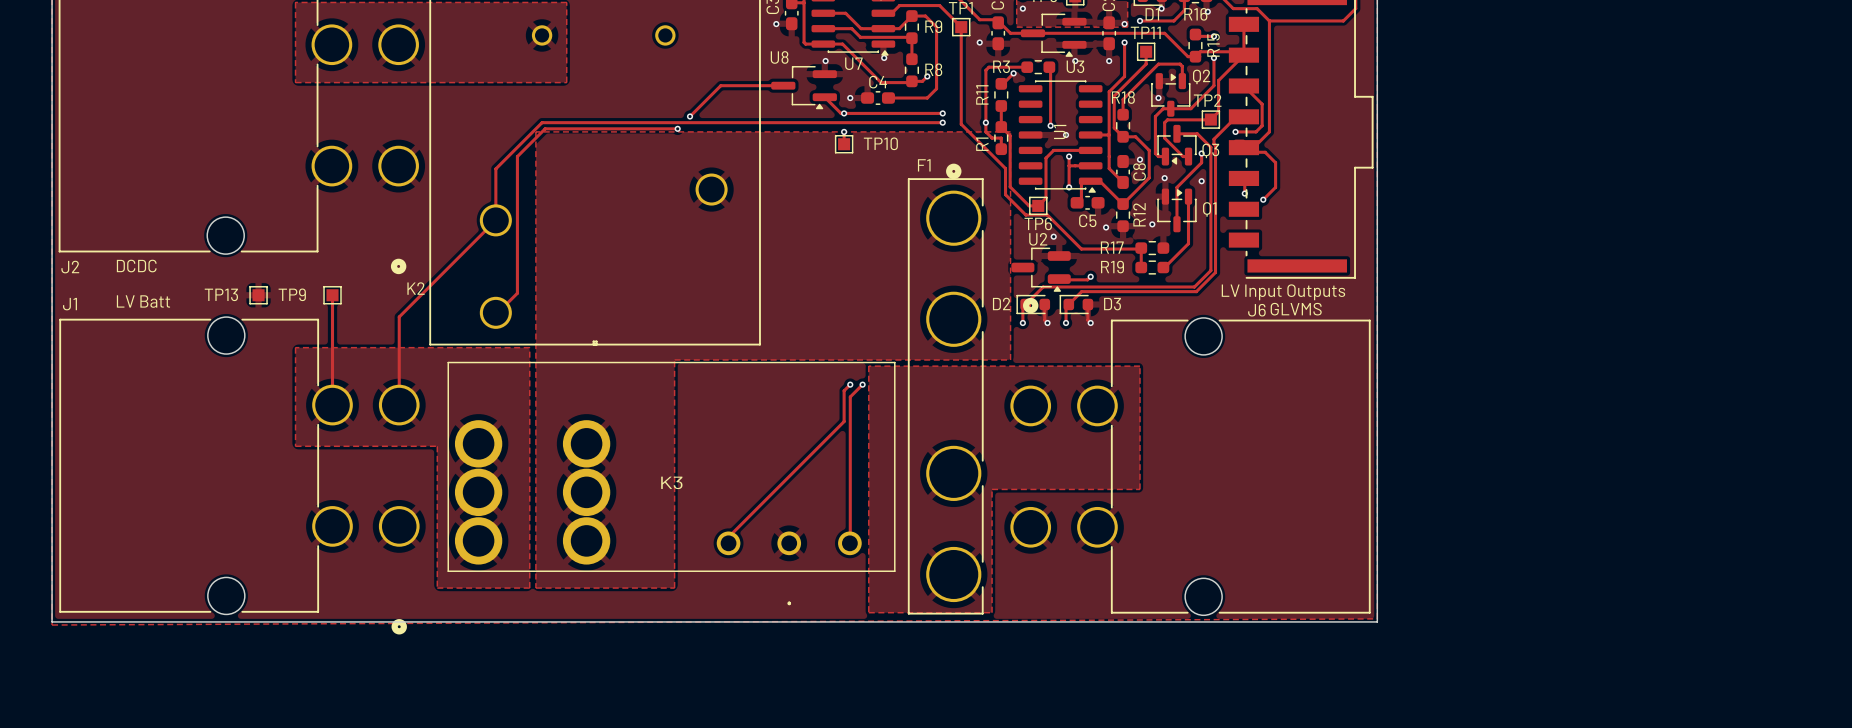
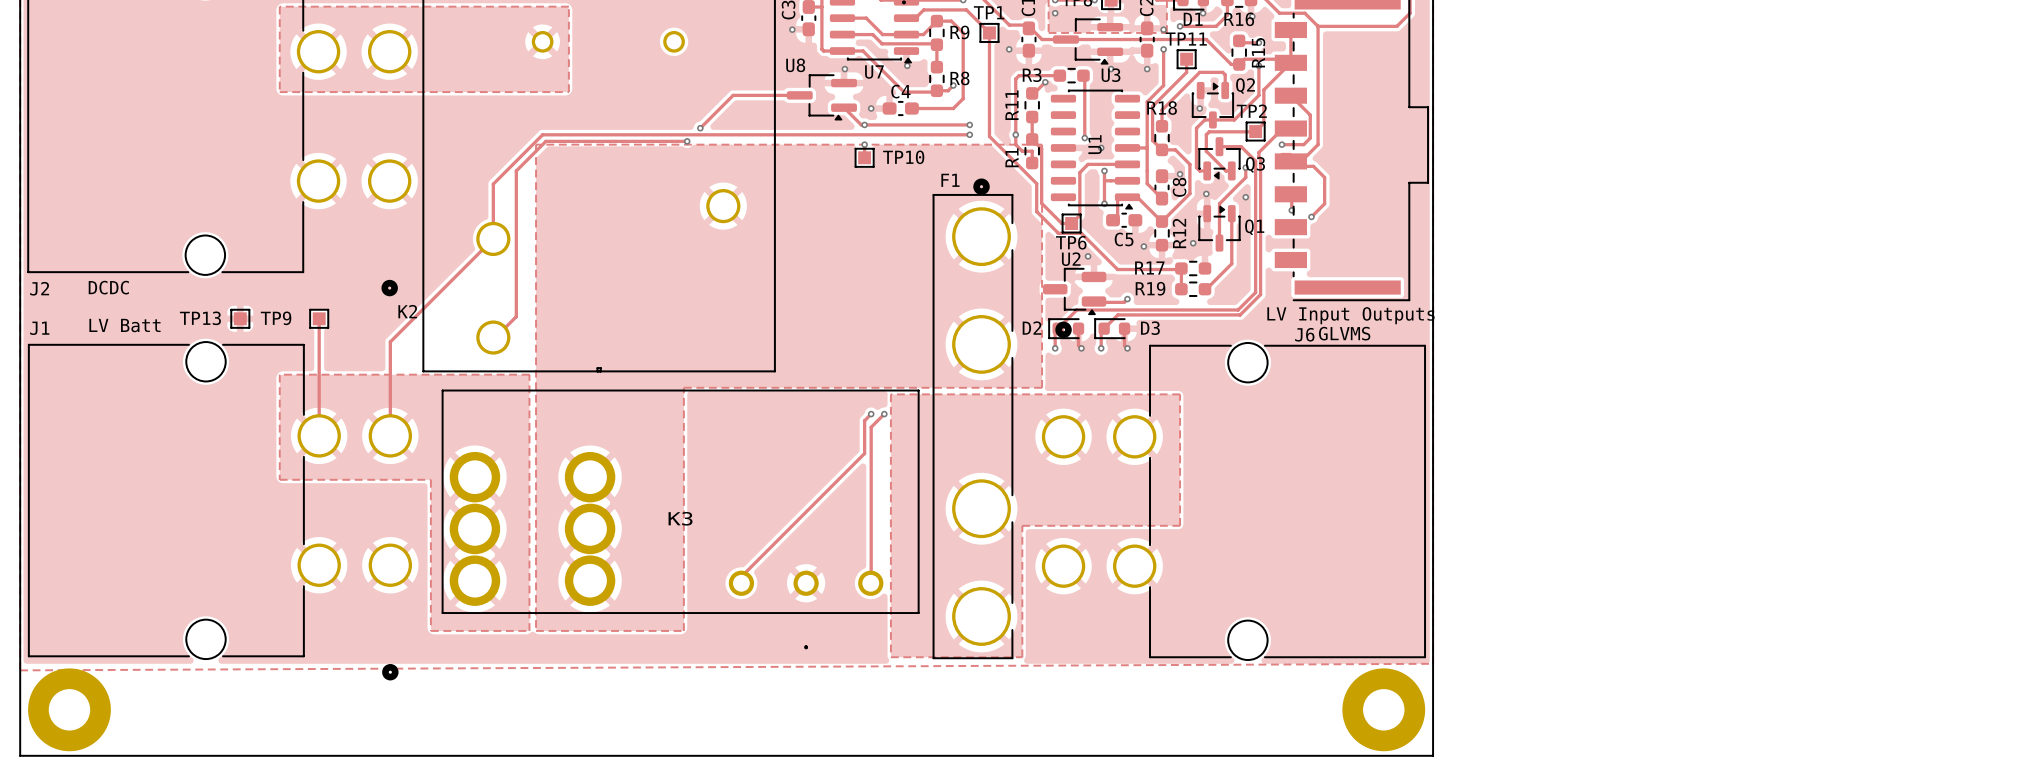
board edge: (52, 621) (1377, 621) -> (20, 667) (20, 755) (1433, 755) (1433, 667)
part: none -> (69, 709)
part: none -> (1383, 709)

